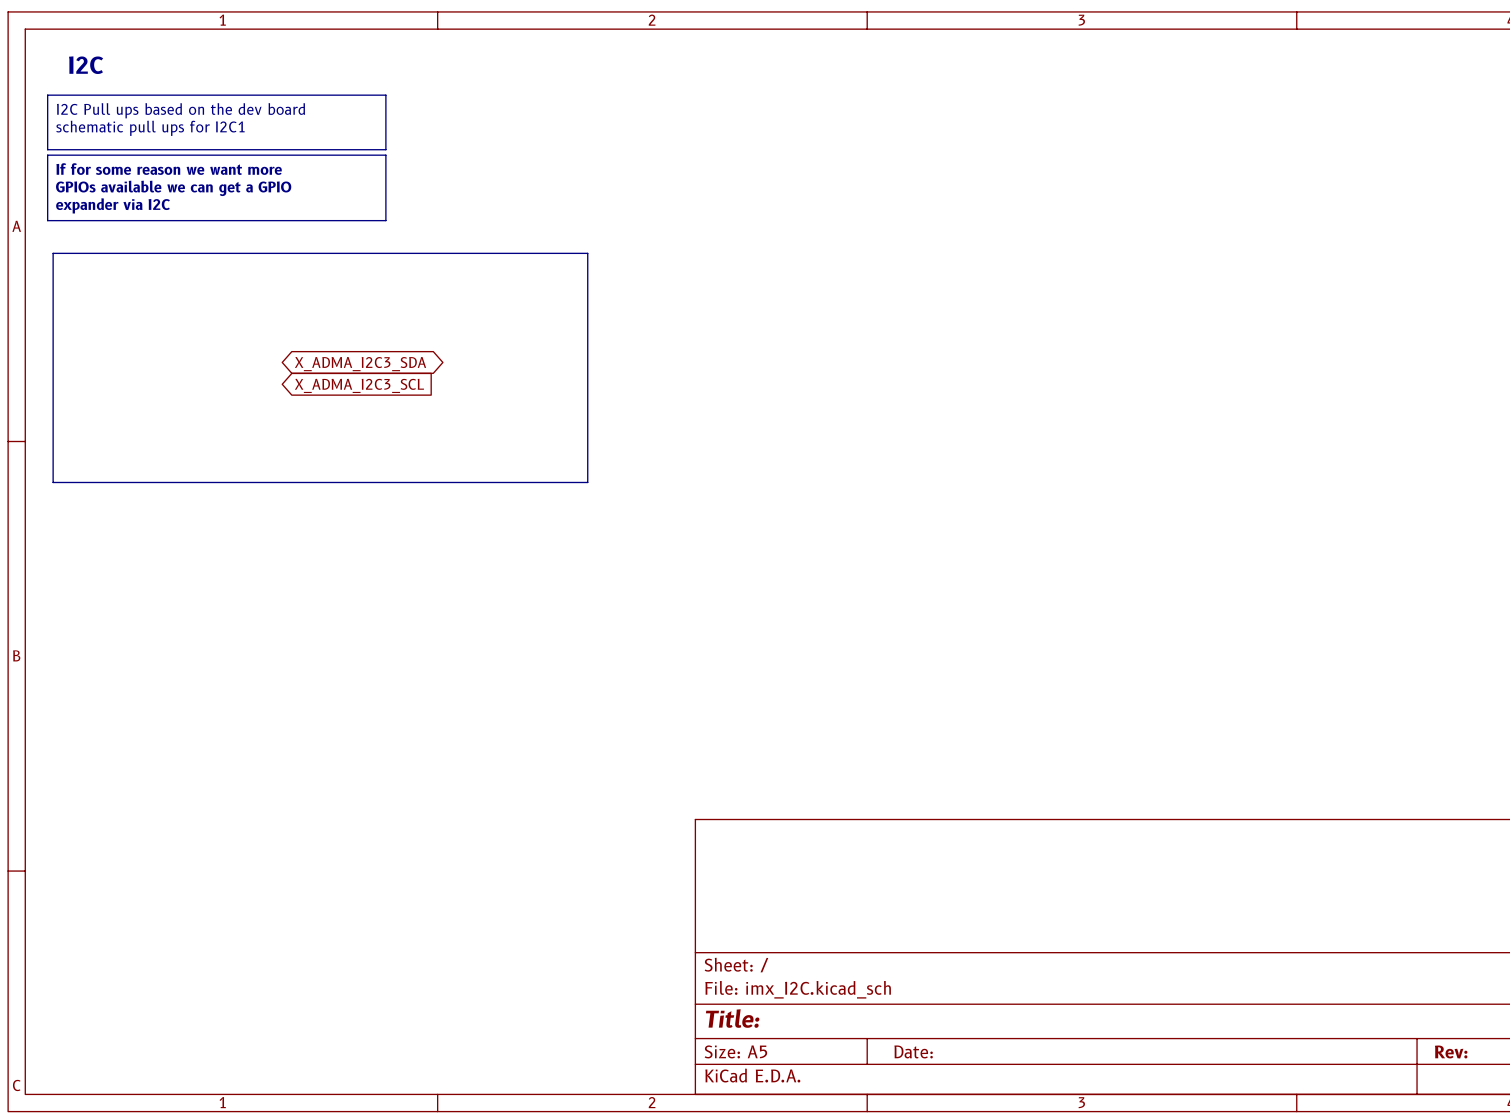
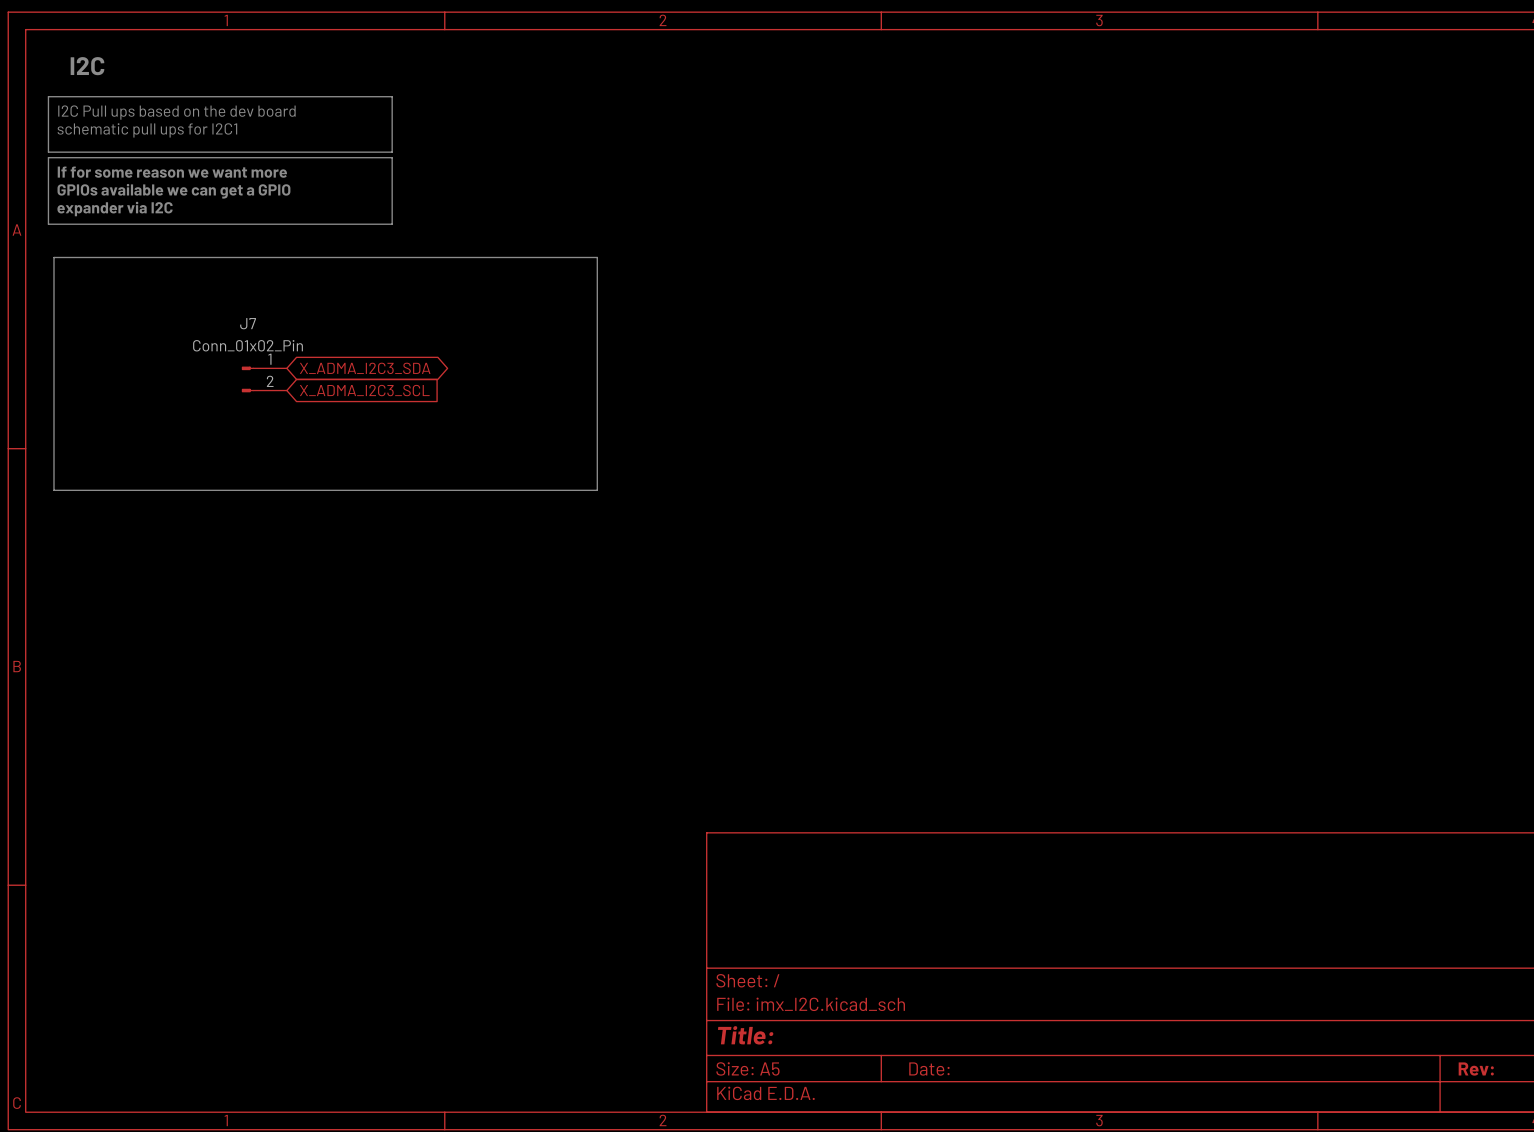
J7: none -> Conn_01x02_Pin (264, 379)

